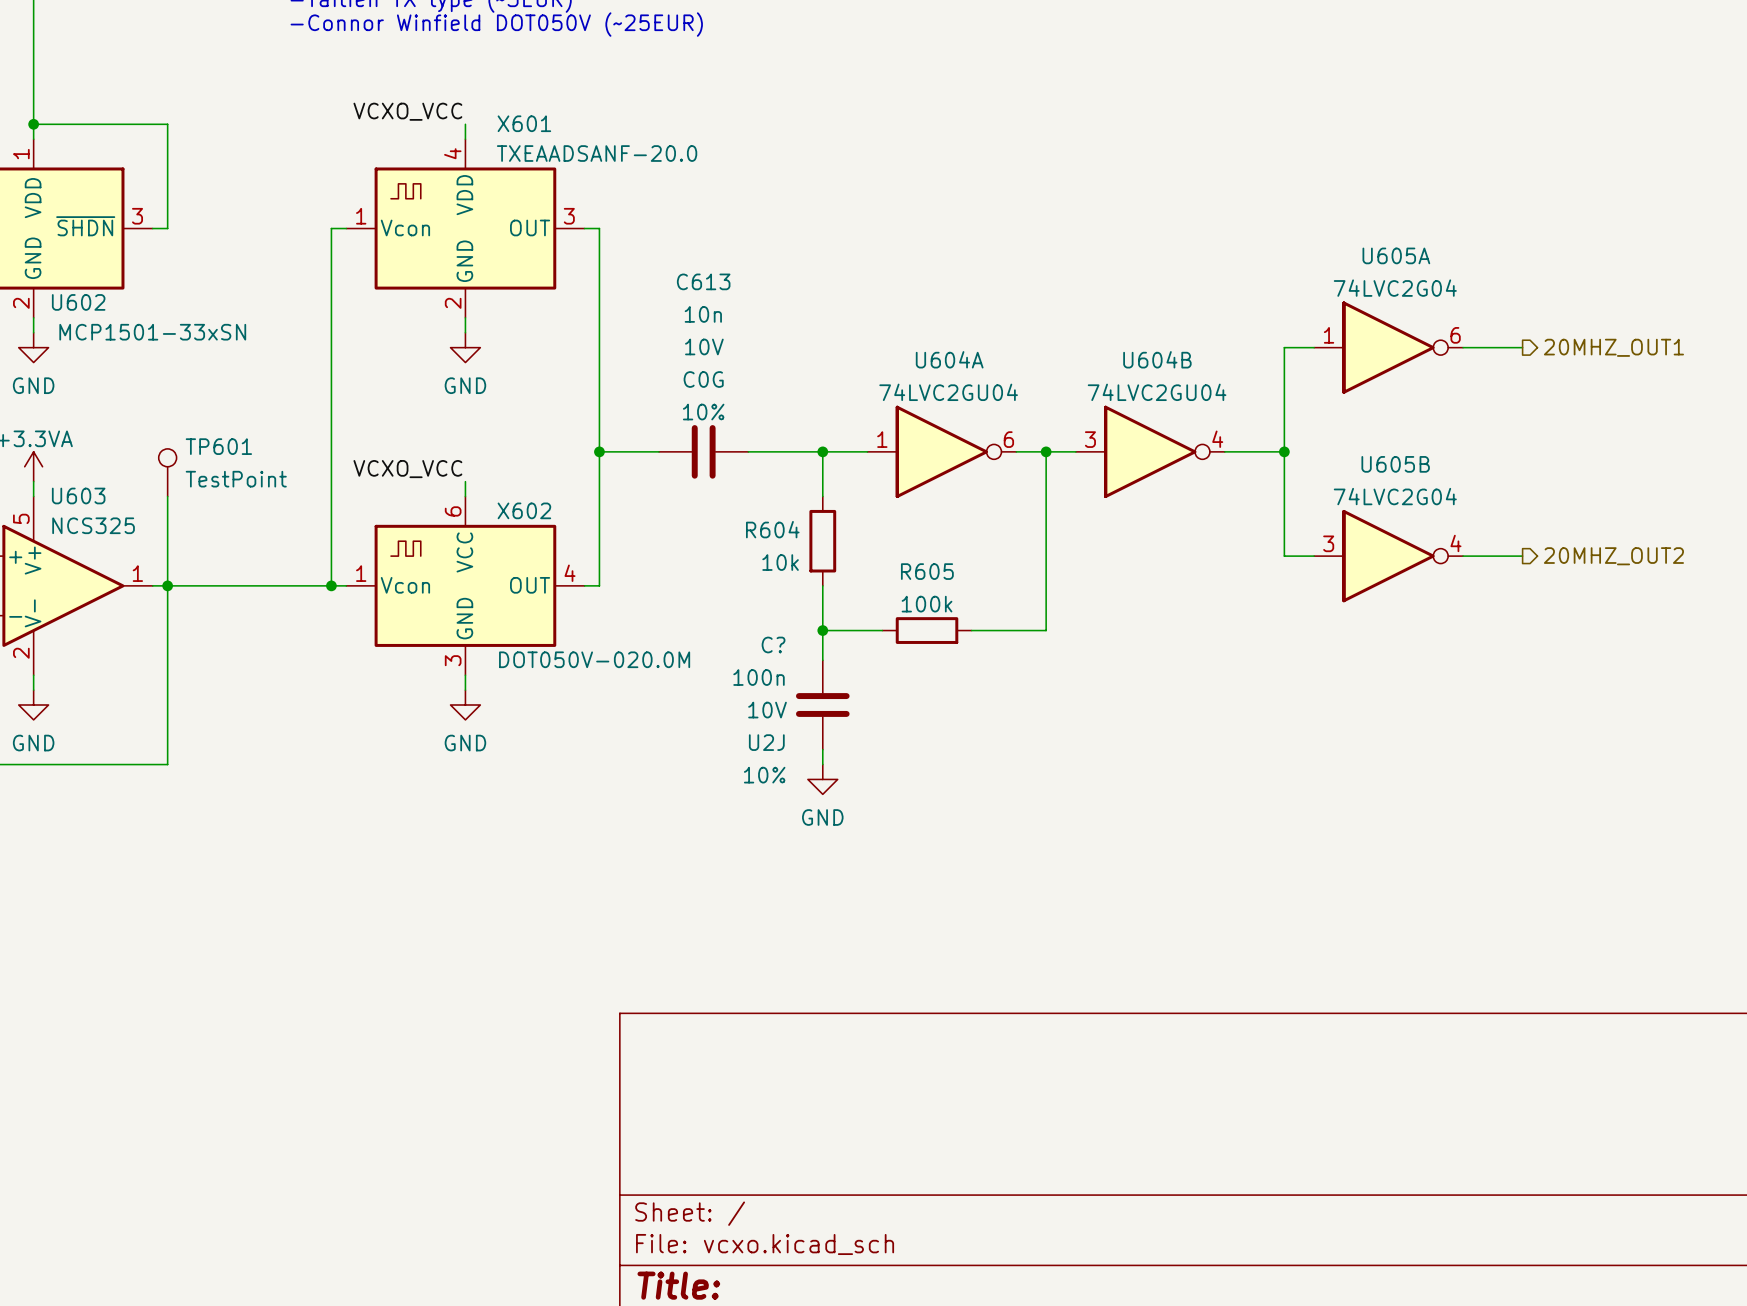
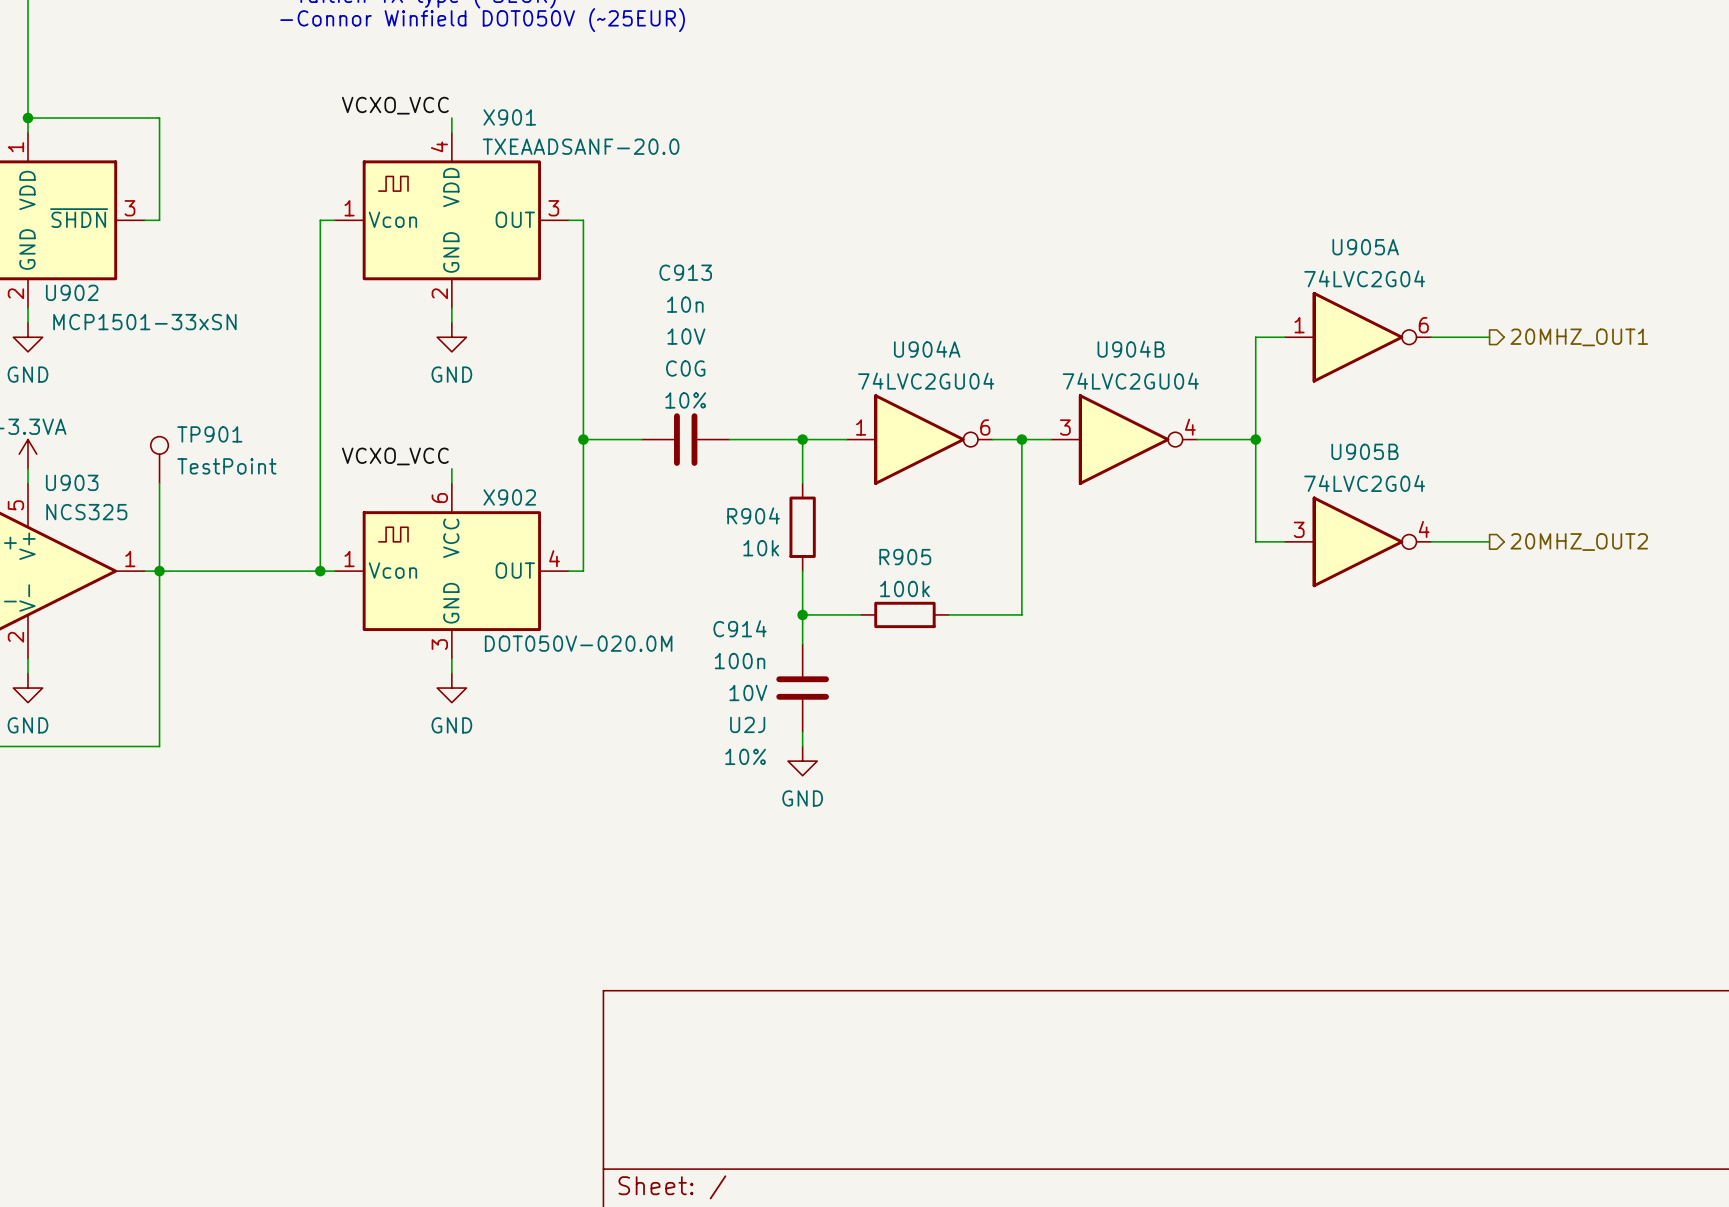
X601 name: X601 (524, 123) -> X901 (509, 117)
U605A name: U605A (1396, 255) -> U905A (1365, 247)
C613 name: C613 (703, 281) -> C913 (685, 272)
U602 name: U602 (78, 302) -> U902 (72, 292)
U604A name: U604A (949, 359) -> U904A (927, 349)
U604B name: U604B (1157, 359) -> U904B (1131, 349)
TP601 name: TP601 (218, 446) -> TP901 (209, 434)
U605B name: U605B (1395, 464) -> U905B (1364, 451)
U603 name: U603 (78, 495) -> U903 (72, 482)
X602 name: X602 (524, 510) -> X902 (509, 497)
R604 name: R604 (772, 529) -> R904 (753, 515)
R605 name: R605 (927, 571) -> R905 (905, 557)
C? name: C? (773, 644) -> C914 (740, 628)

